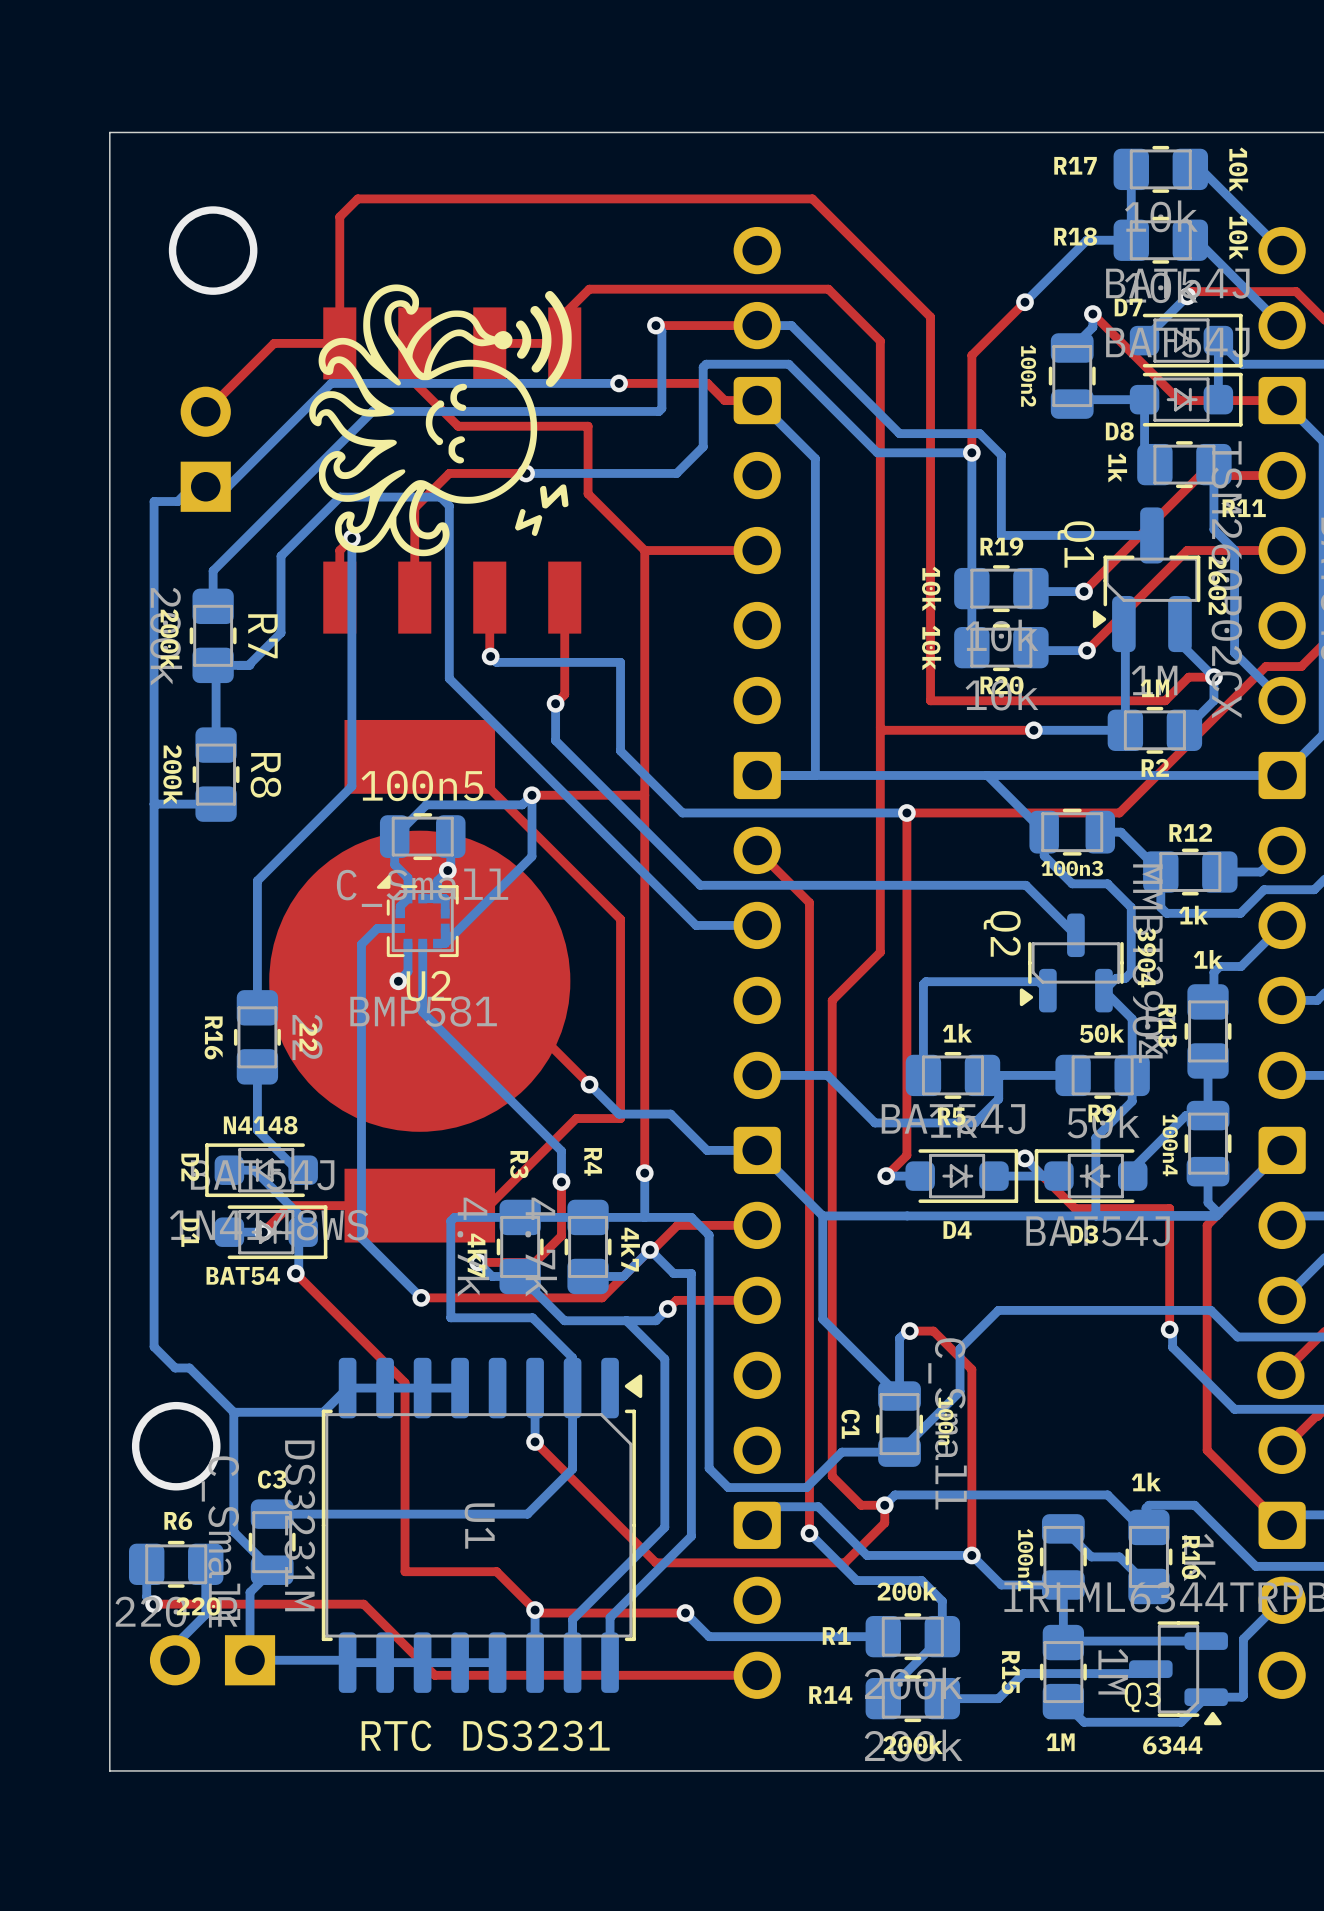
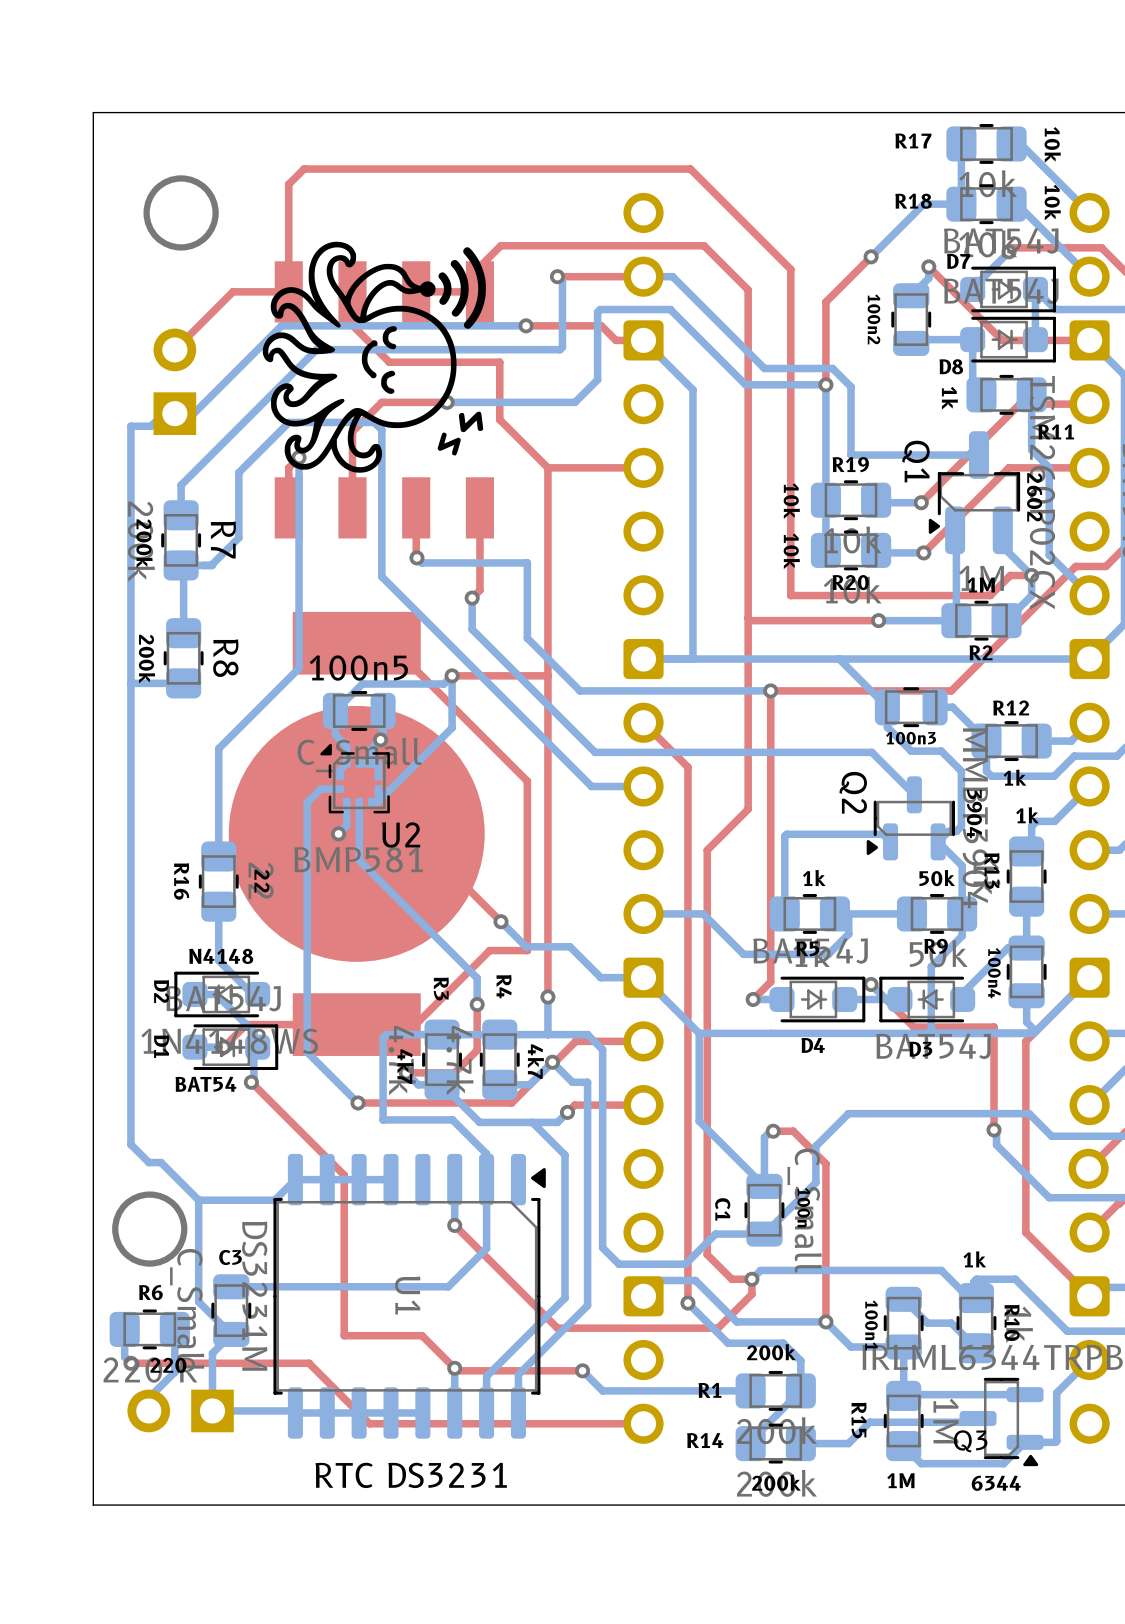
U2 name position: U2 (429, 986) -> U2 (401, 834)

